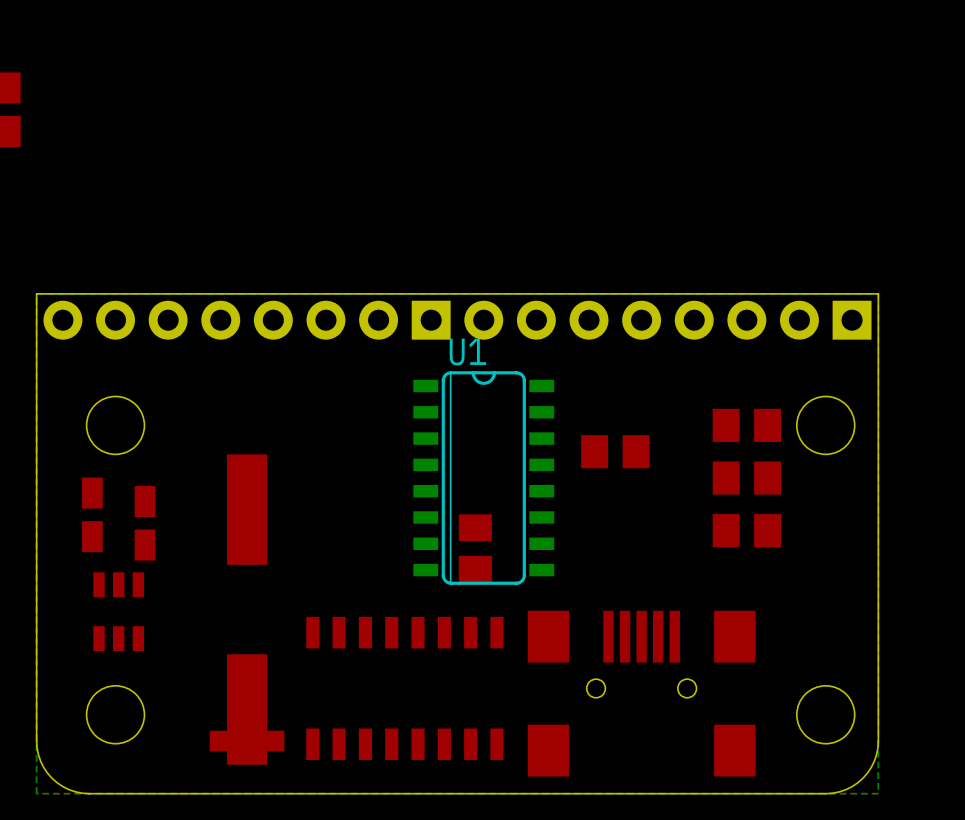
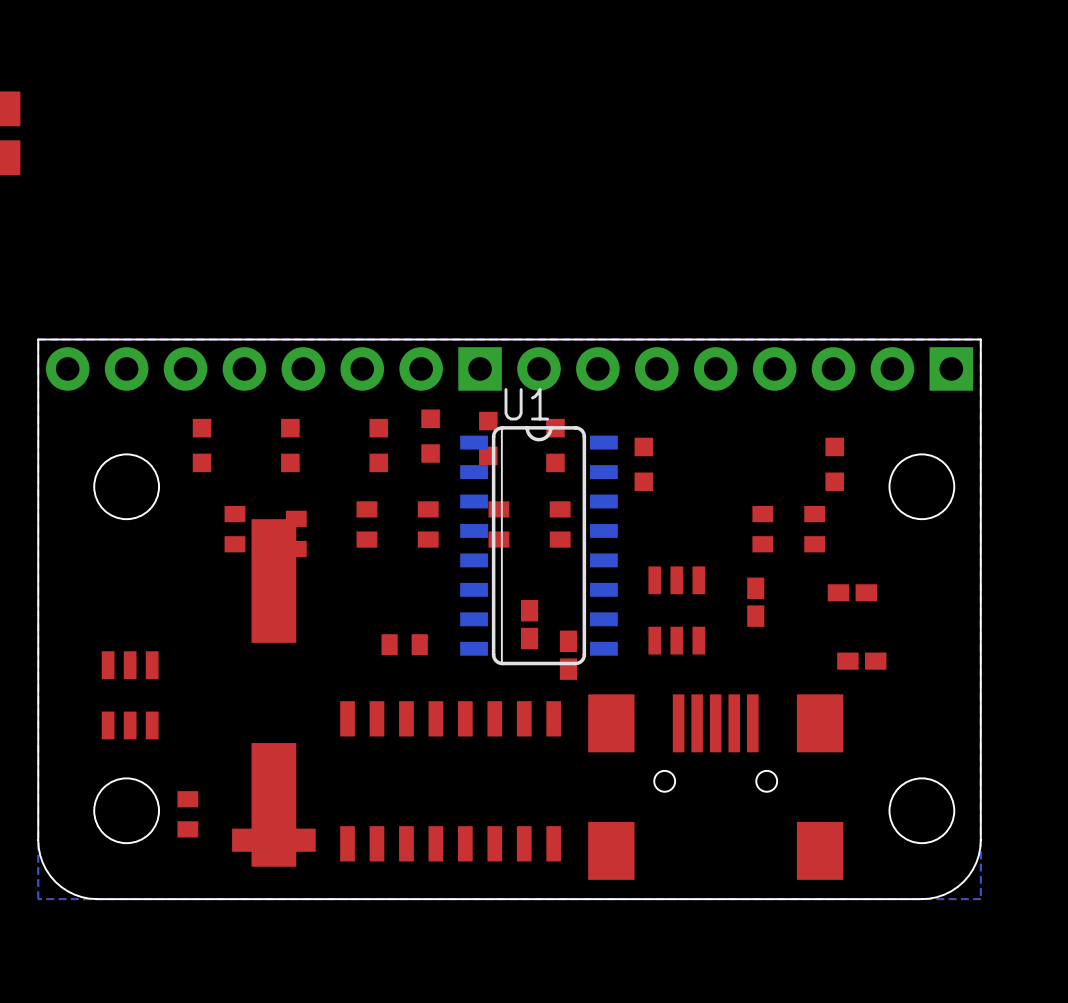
part: none -> (430, 436)
part: none -> (488, 438)
part: none -> (202, 445)
part: none -> (290, 445)
part: none -> (378, 445)
part: none -> (555, 445)
part: none -> (643, 464)
part footprint: [712, 408, 782, 442] -> [825, 437, 844, 492]
part: (615, 451) -> none
part: none -> (366, 524)
part: none -> (428, 524)
part: none -> (498, 524)
part: none -> (560, 524)
part: none -> (235, 529)
part: none -> (762, 529)
part: none -> (814, 529)
part: none -> (296, 533)
part: (746, 478) -> none
part: (92, 514) -> none
part footprint: [458, 514, 492, 583] -> [520, 599, 539, 650]
part footprint: [712, 514, 782, 548] -> [827, 584, 878, 602]
part: (144, 523) -> none
part: none -> (755, 602)
part: none -> (676, 610)
part: none -> (404, 644)
part: none -> (568, 655)
part: none -> (861, 661)
part: none -> (187, 814)

